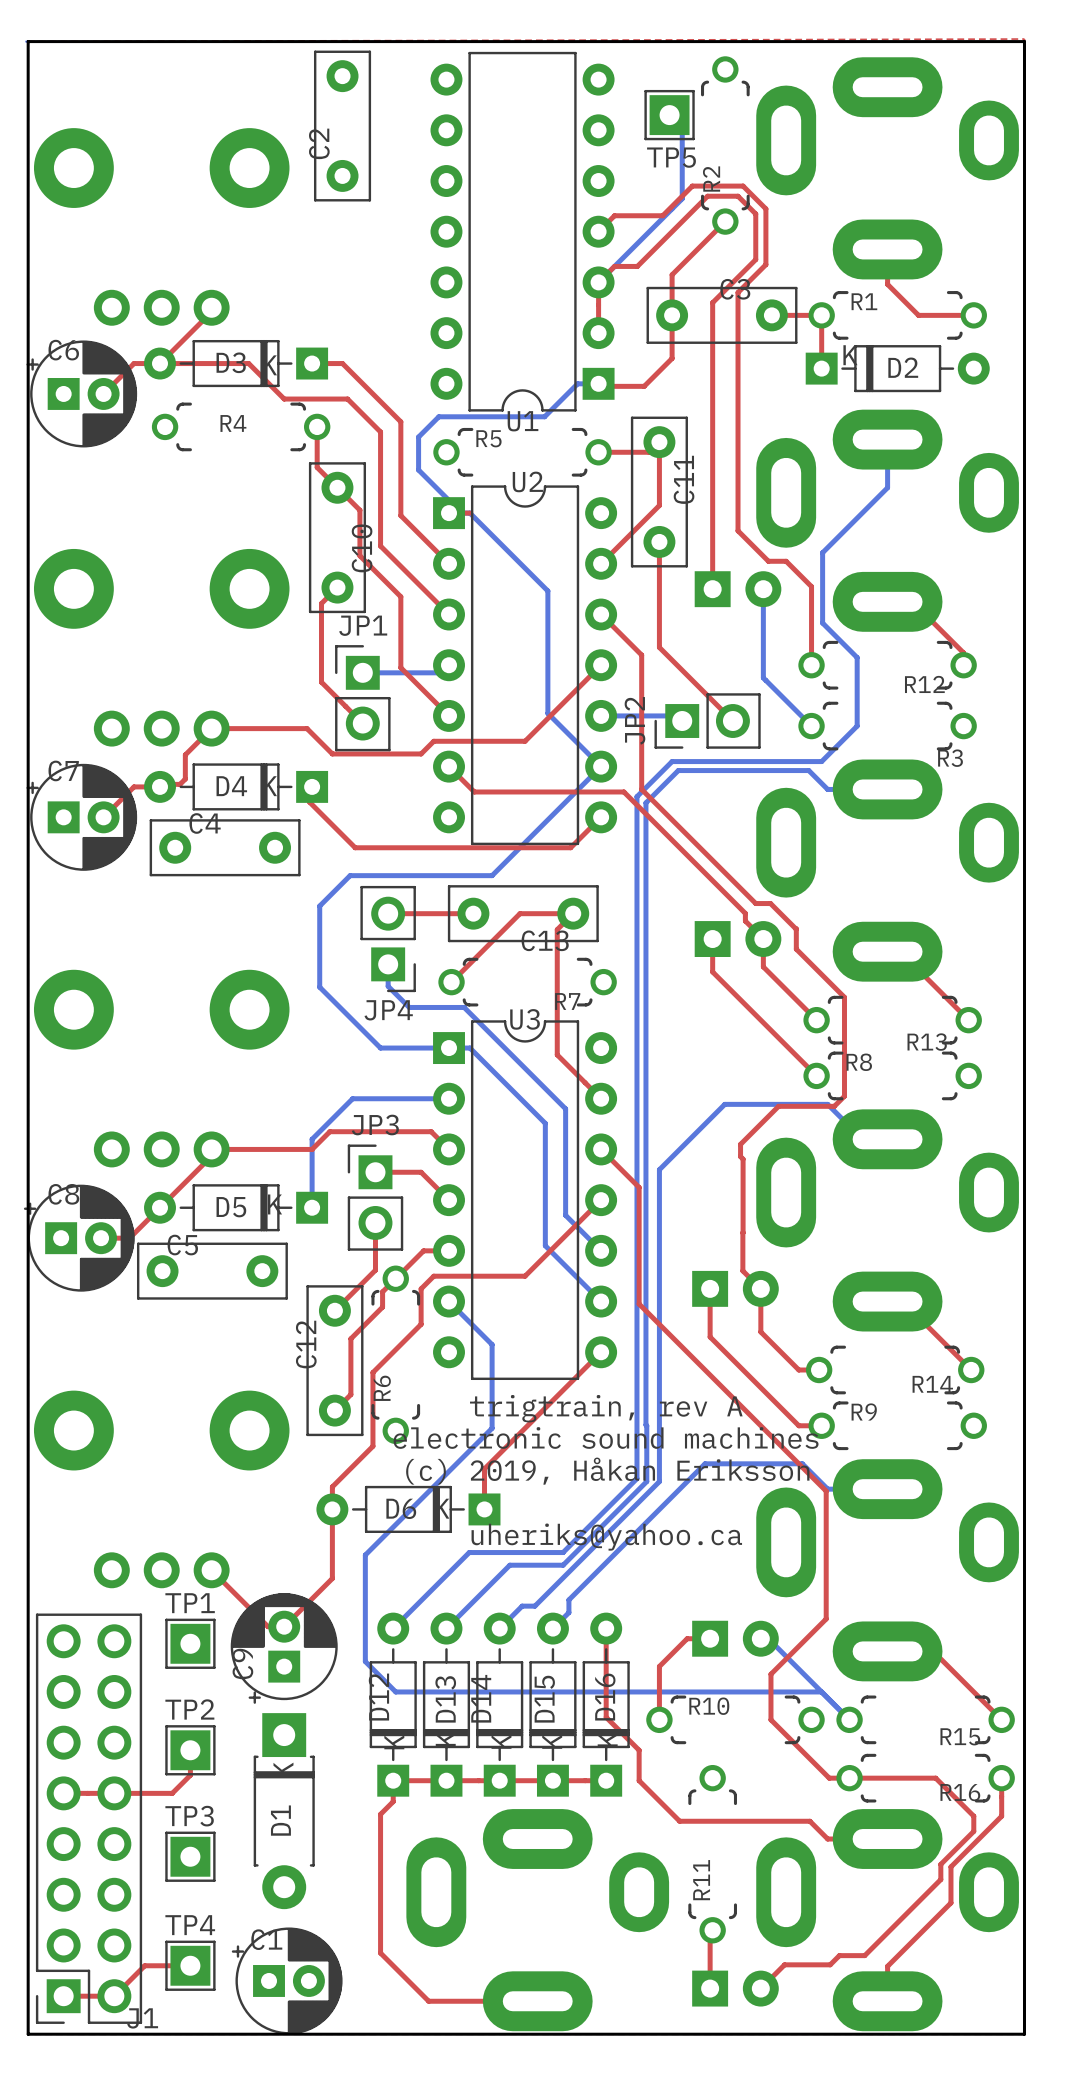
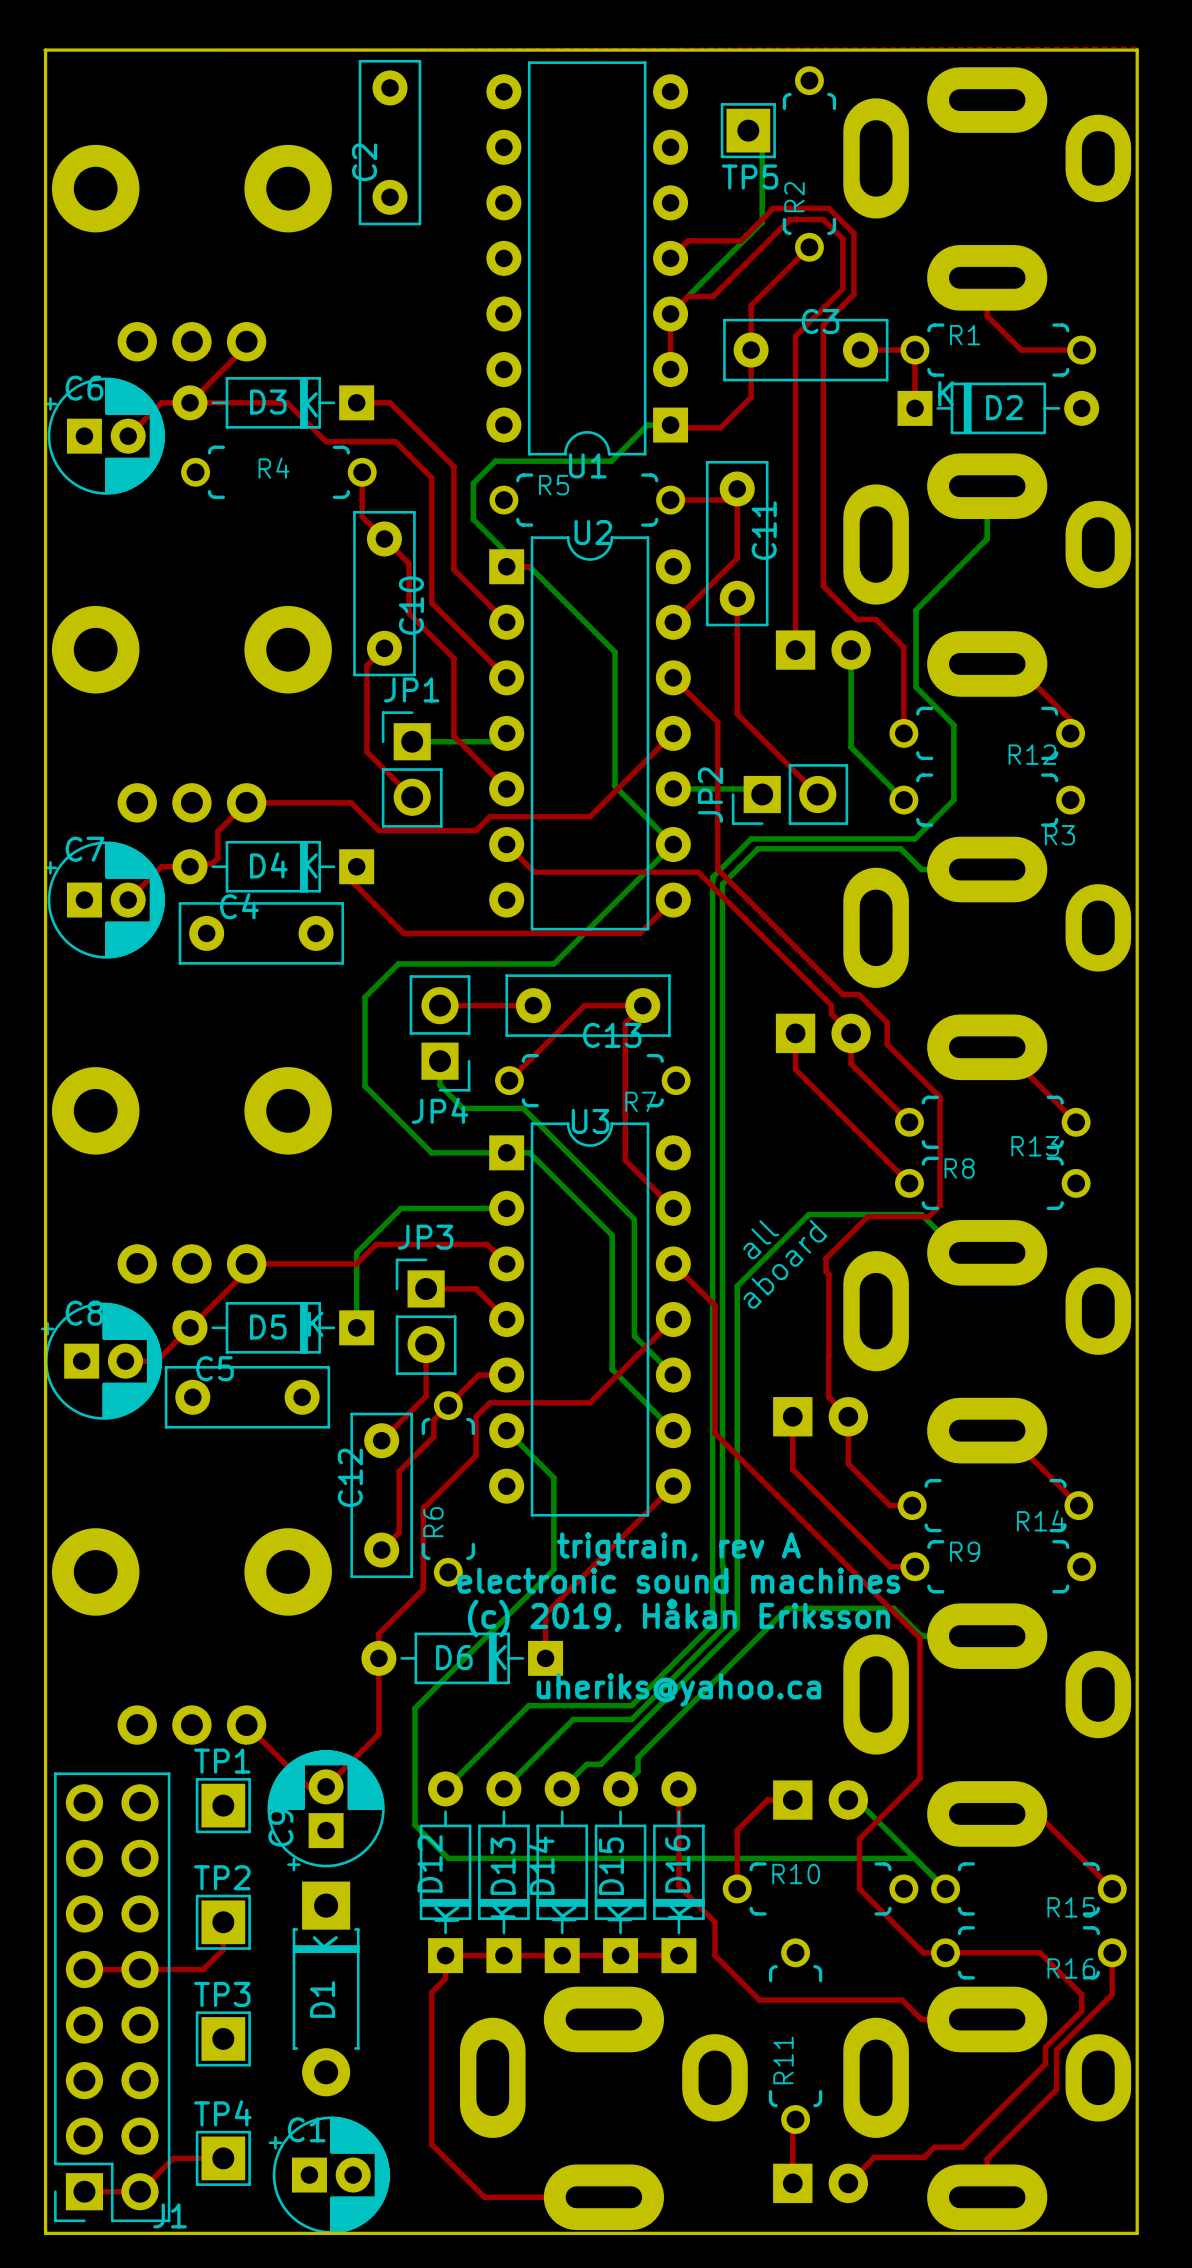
text: none -> all (761, 1239)
text: none -> aboard (785, 1264)

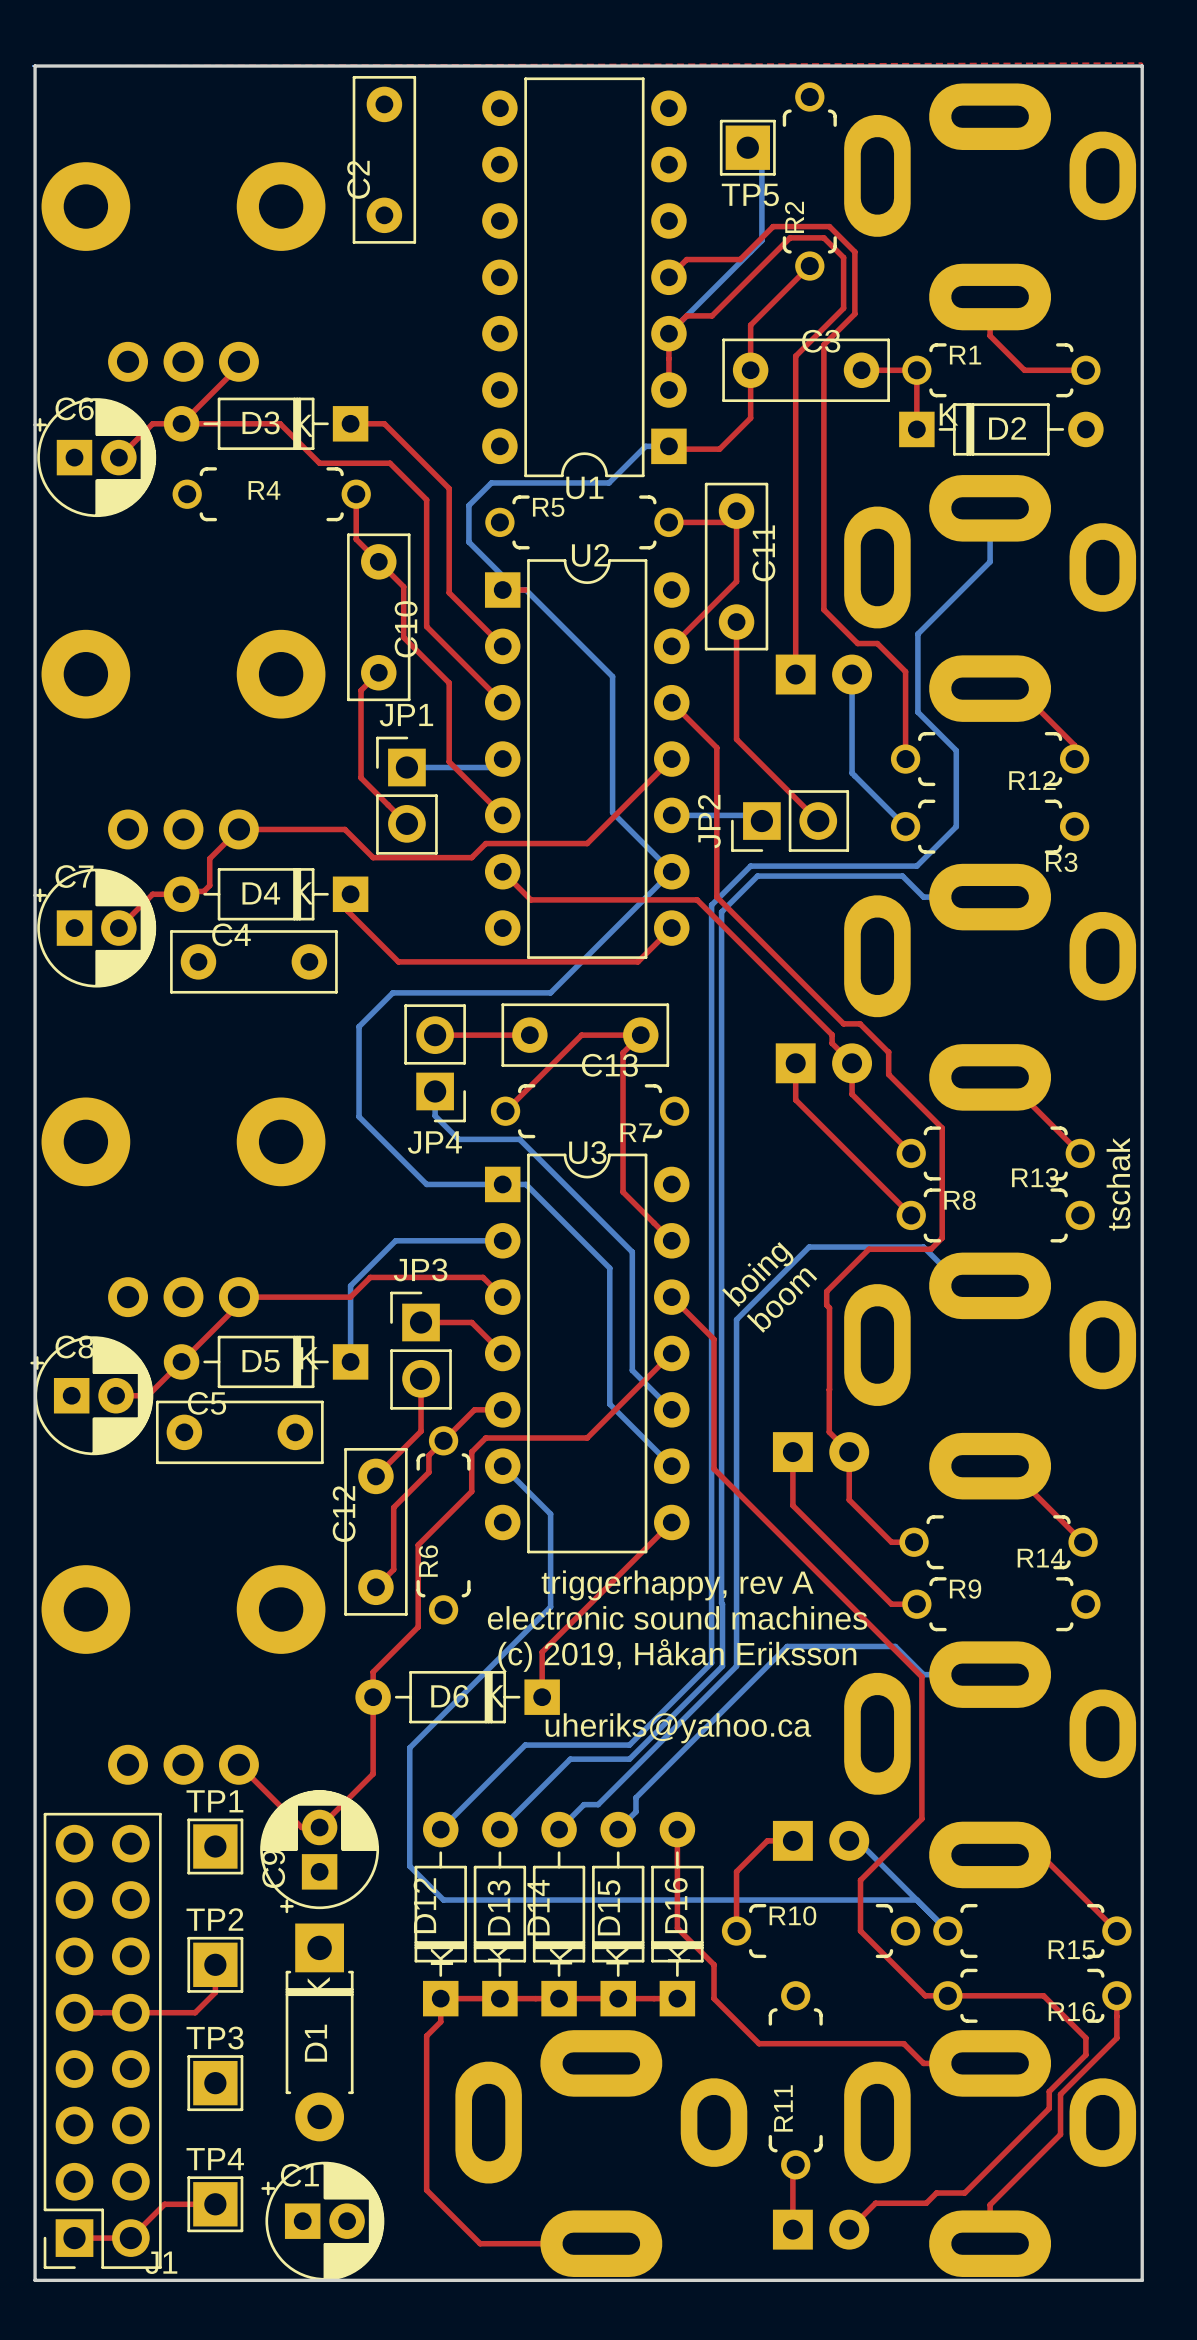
text: none -> tschak (1118, 1184)
text: all (761, 1239) -> boing (759, 1274)
text: aboard (785, 1264) -> boom (782, 1300)
text: trigtrain, rev A (678, 1549) -> triggerhappy, rev A (677, 1585)

